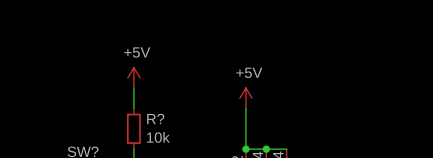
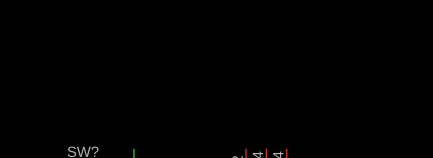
power symbol: +5V (133, 77) -> none
wire: (133, 88) (133, 108) -> none
power symbol: +5V (245, 98) -> none
wire: (245, 108) (245, 149) (286, 149) -> none
R?: 10k (133, 128) -> none
junction: (245, 149) -> none
junction: (266, 149) -> none

